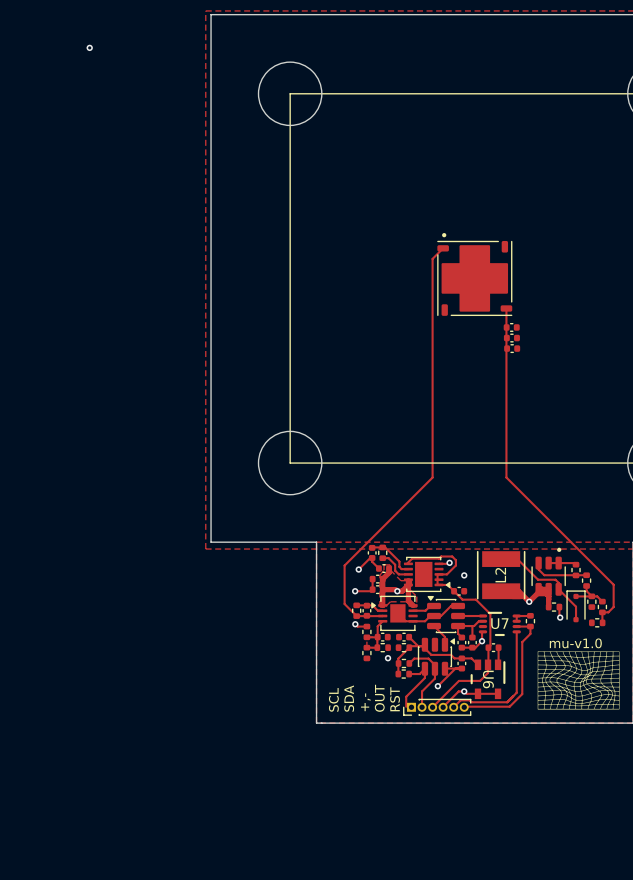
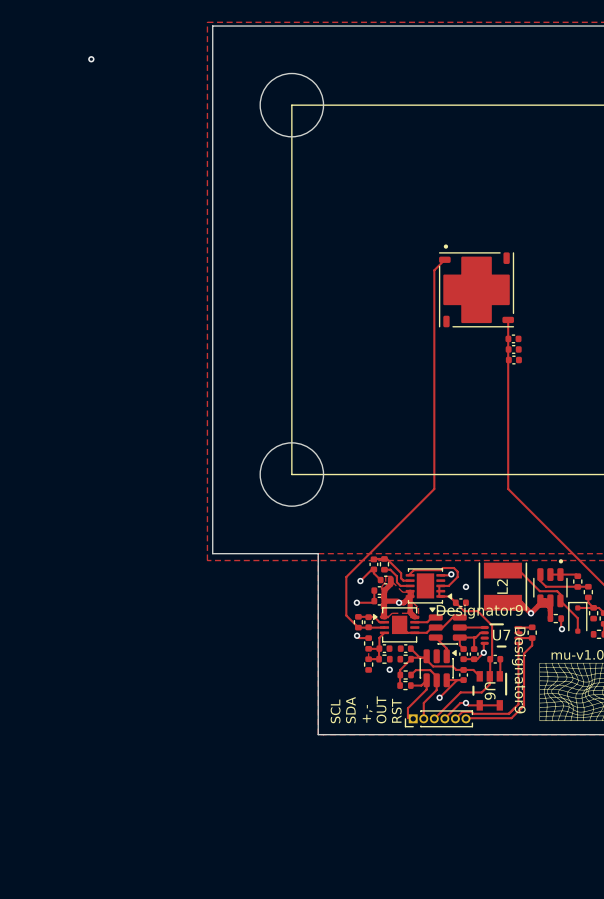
U7 text: none -> Designator9 (479, 611)
U6 text: none -> Designator9 (518, 670)

